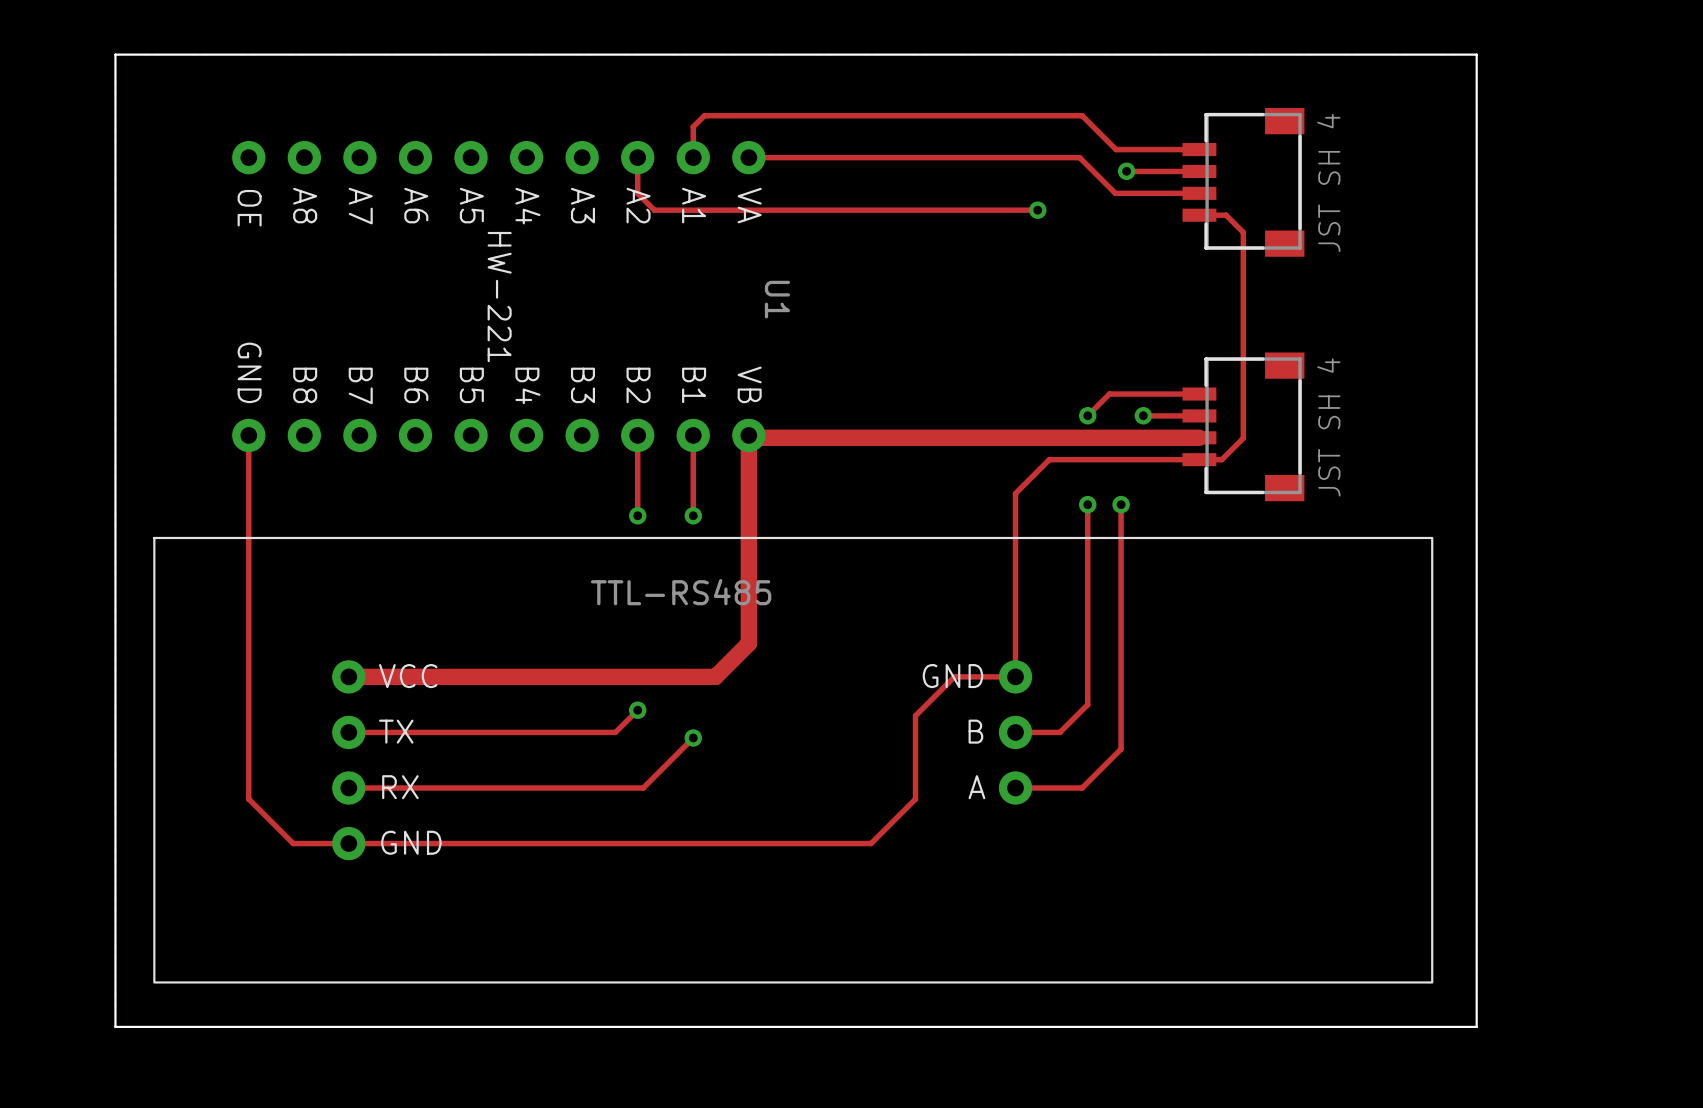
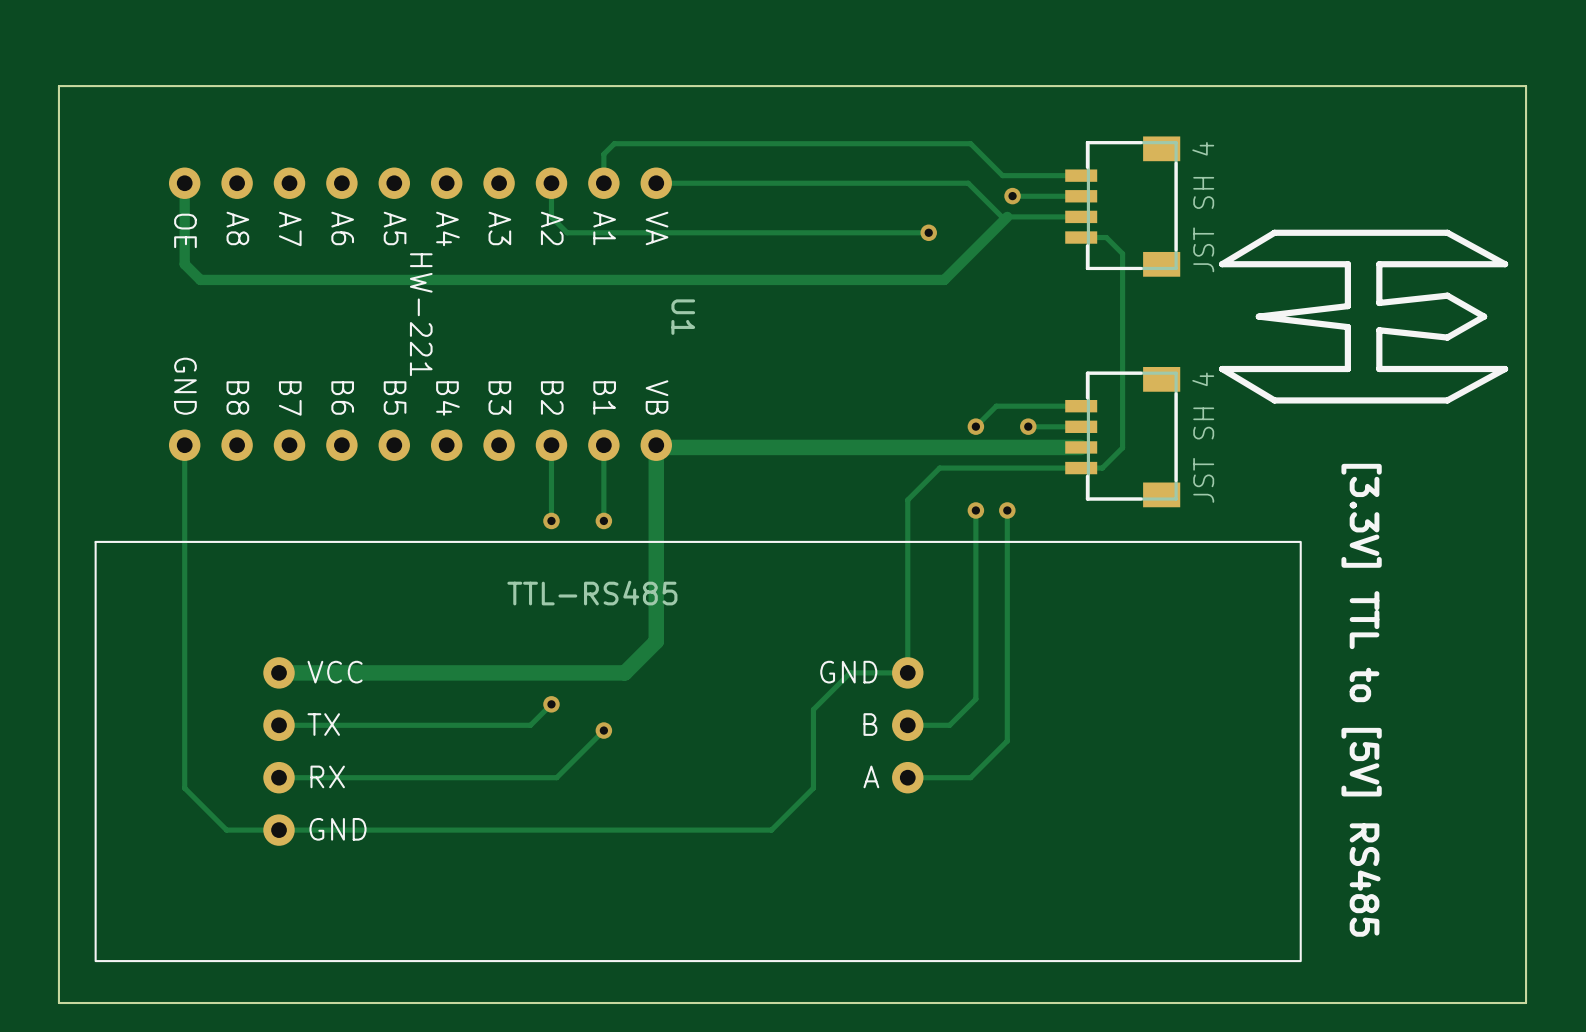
board edge: (1476, 54) (1476, 1026) -> (1342, 86) (1526, 86) (1526, 1003) (1342, 1003)
track: none -> (184, 183) (184, 264) (200, 279) (944, 279) (1007, 216)
line: none -> (1274, 232) (1222, 264) (1347, 264) (1347, 306) (1258, 316) (1347, 327) (1347, 369) (1222, 369) (1274, 400) (1447, 400) (1505, 369) (1379, 369) (1379, 330) (1447, 337) (1484, 316) (1447, 295) (1379, 302) (1379, 264) (1505, 264) (1447, 232) (1274, 232)
text: none -> [3.3V] TTL to [5V] RS485 (1361, 700)

